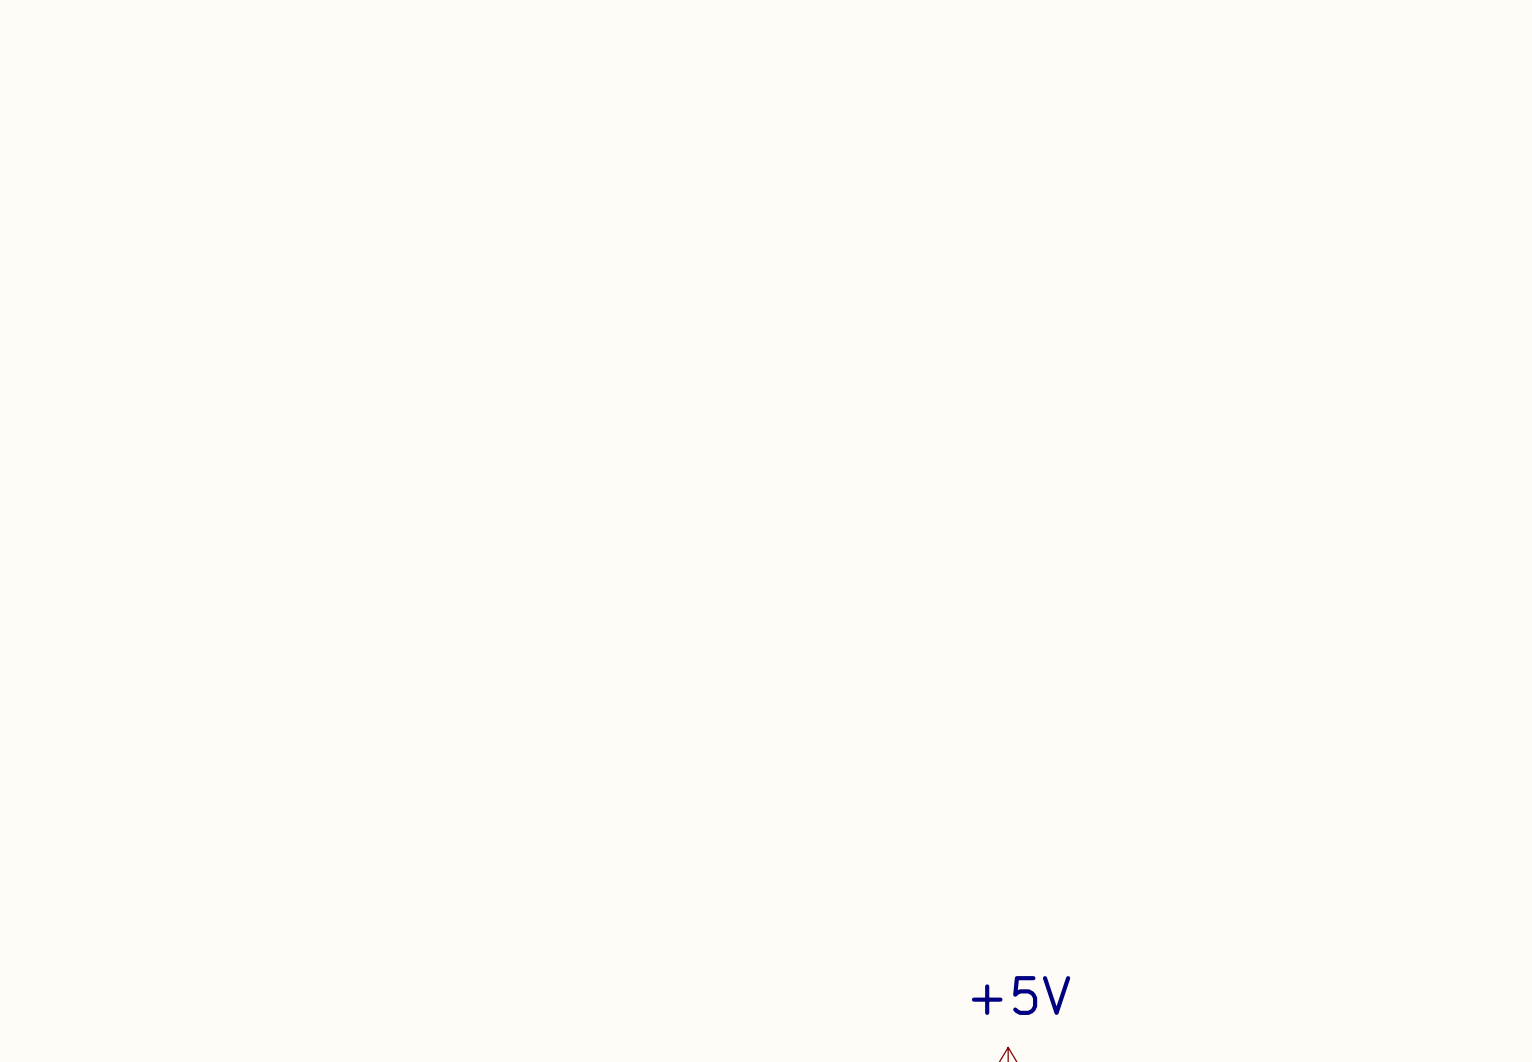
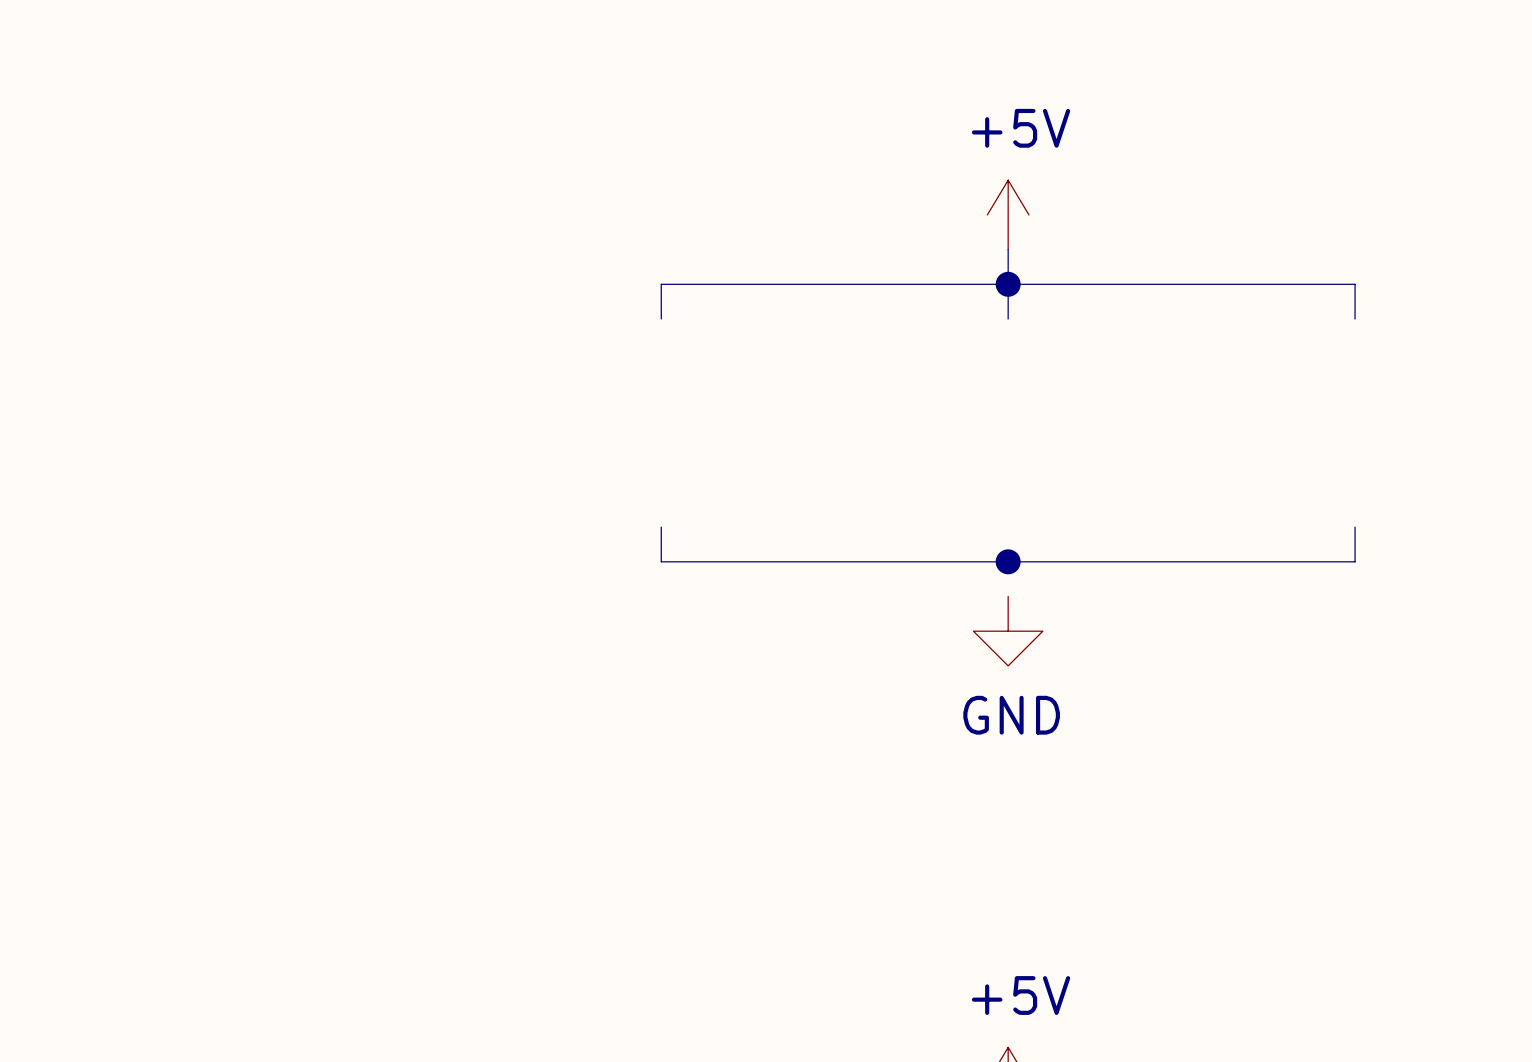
power symbol: none -> +5V (1008, 214)
wire: none -> (1008, 249) (1008, 319)
junction: none -> (1008, 284)
wire: none -> (661, 319) (661, 284) (1355, 284) (1355, 319)
wire: none -> (661, 527) (661, 561) (1355, 561) (1355, 527)
junction: none -> (1008, 561)
power symbol: none -> GND (1008, 631)

